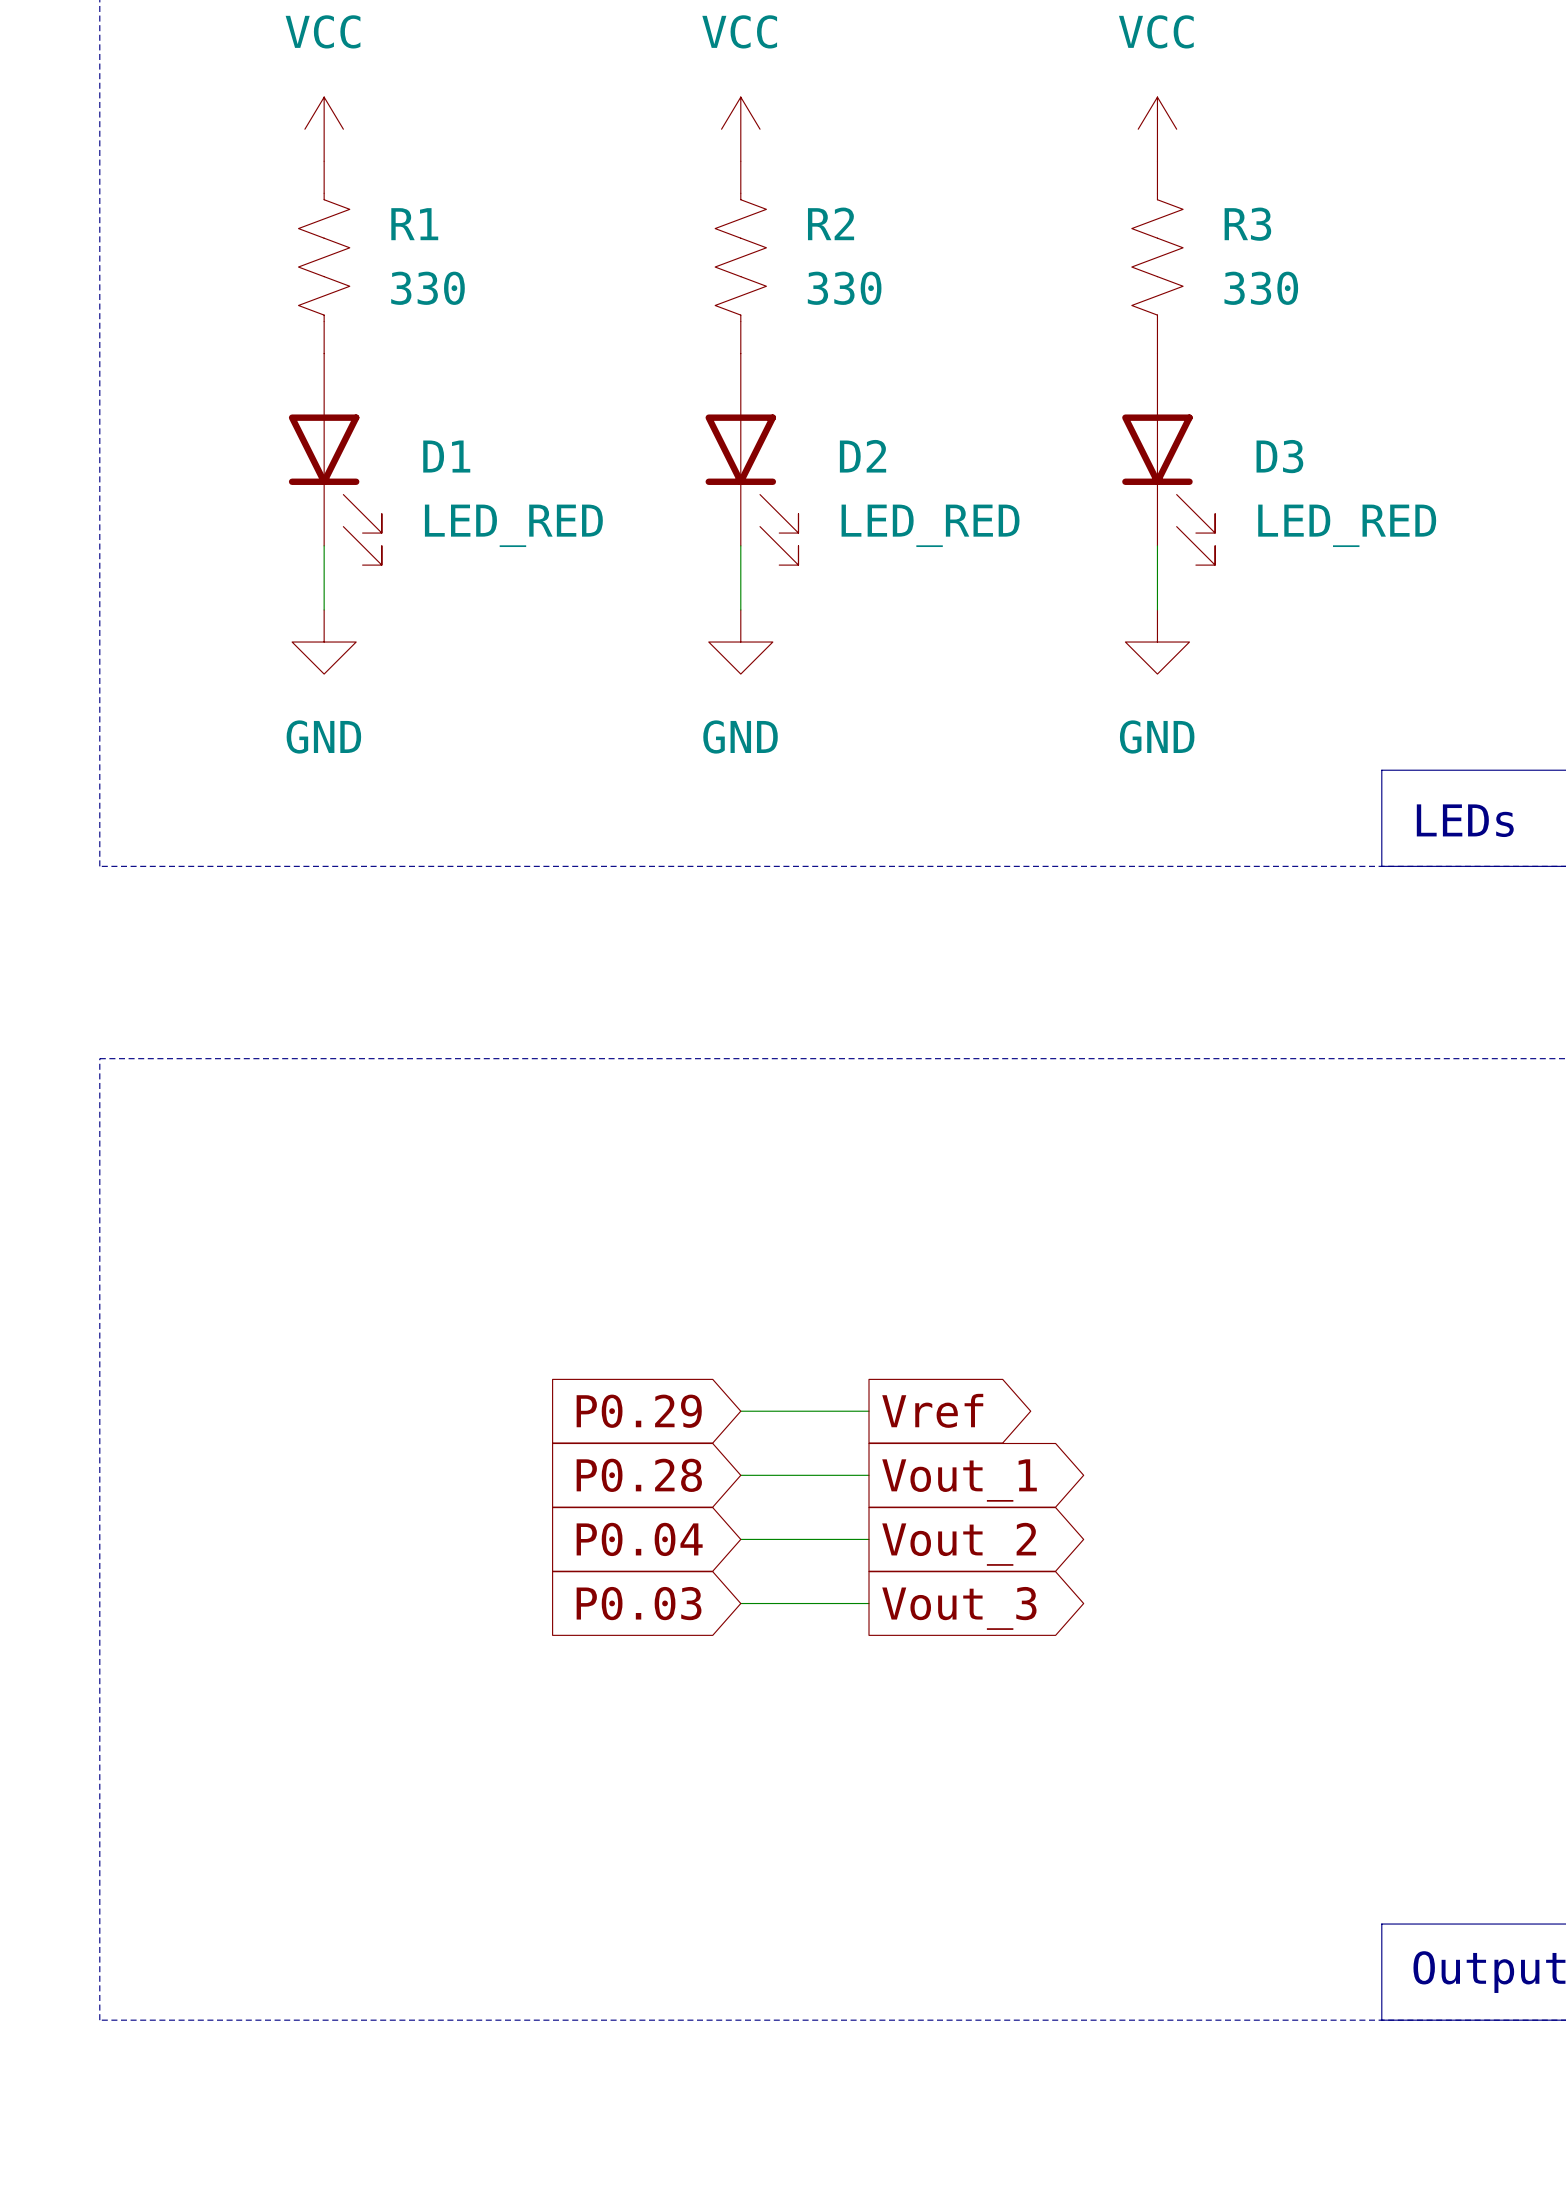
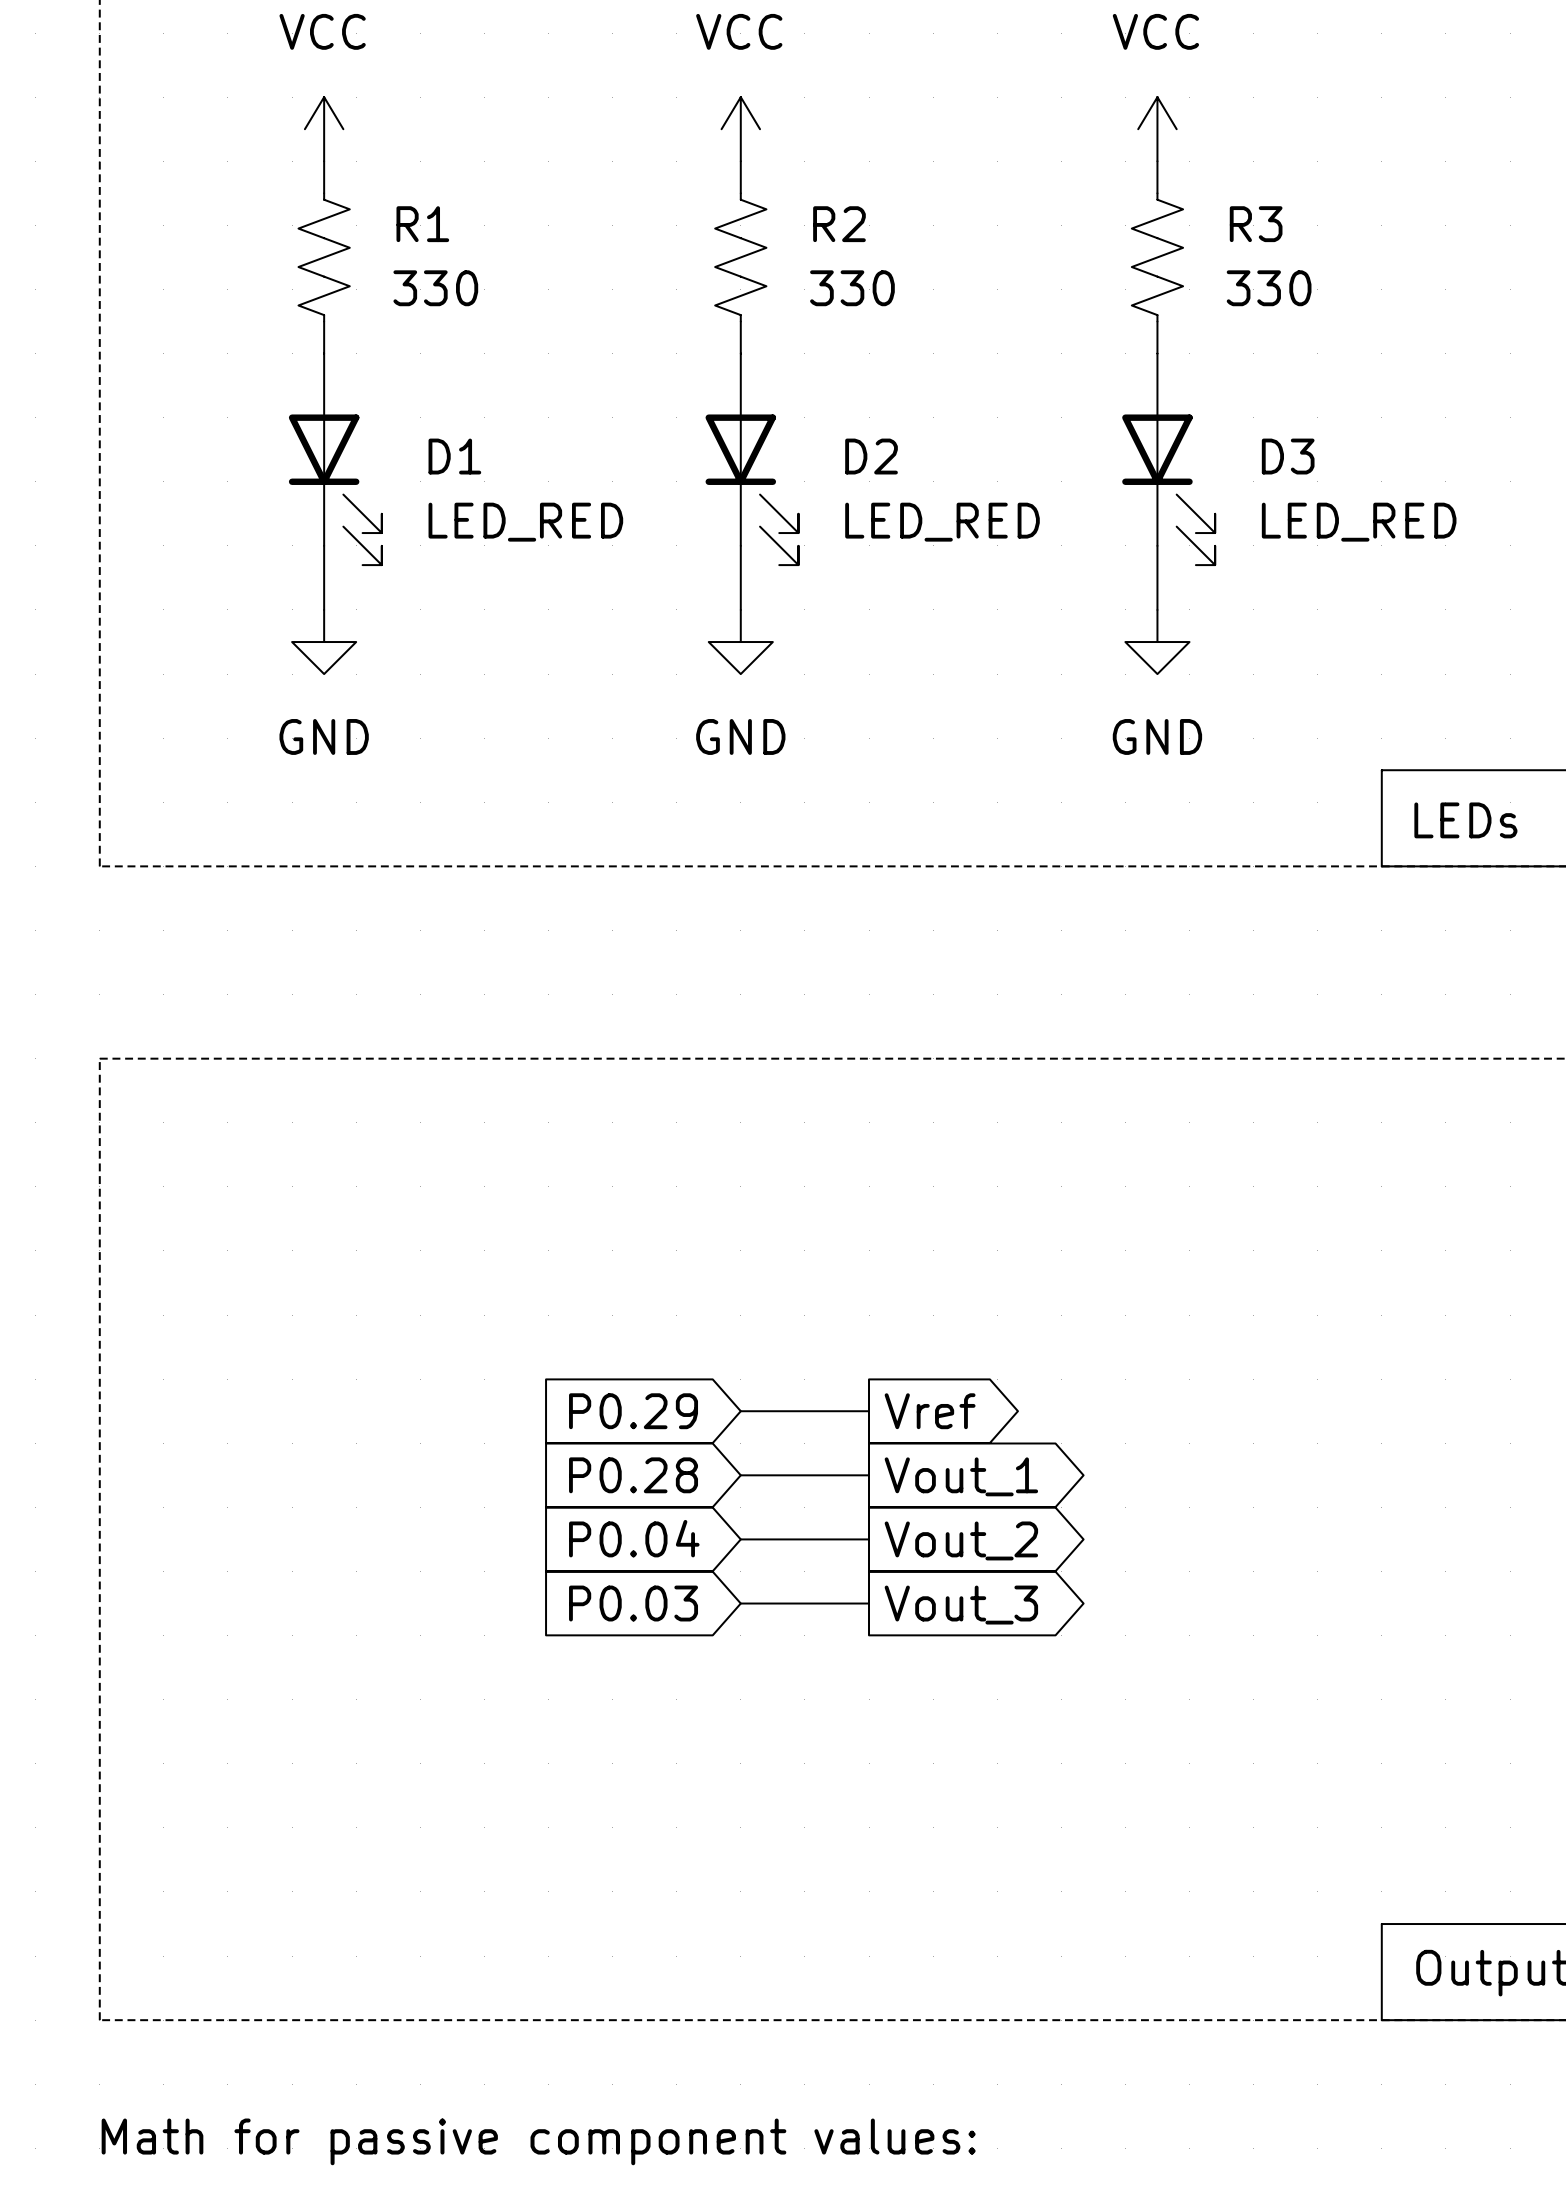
text: none -> Math for passive component values: (538, 2141)

